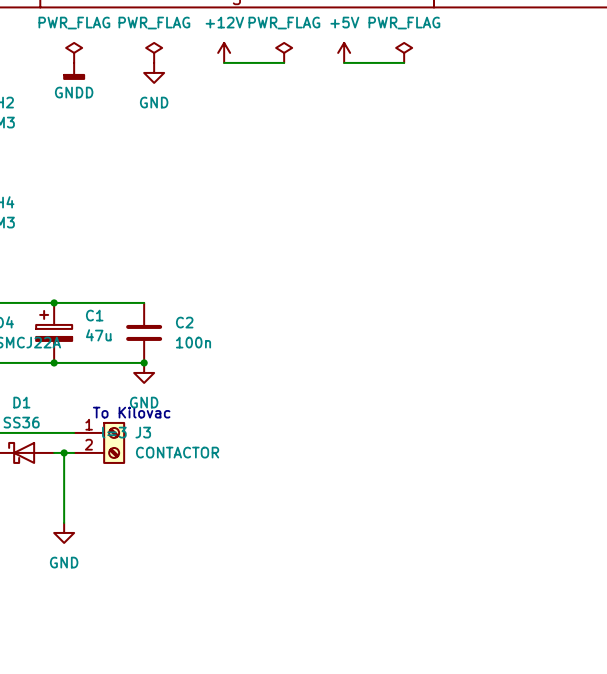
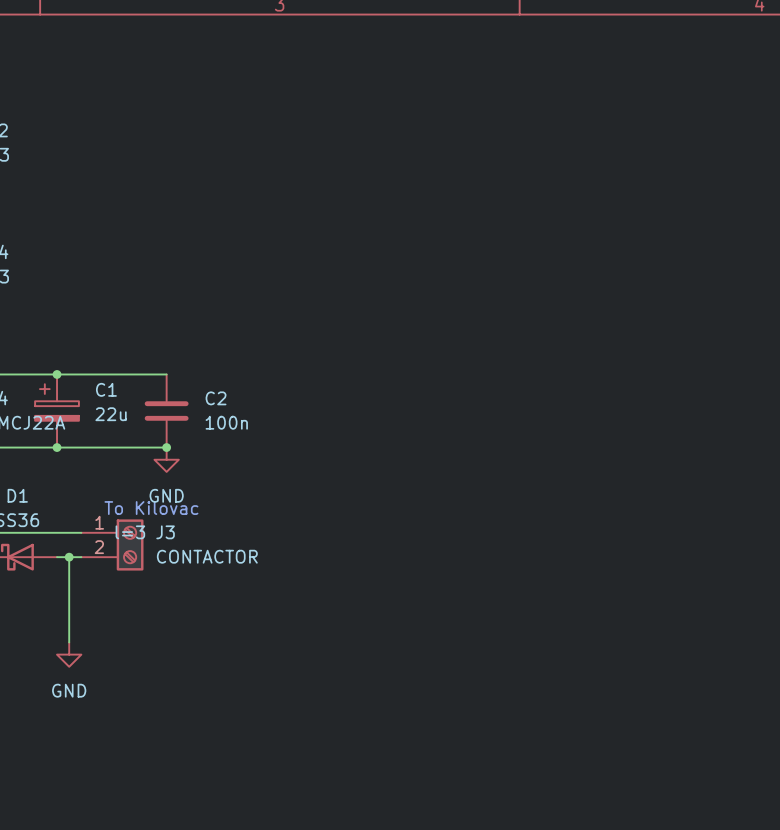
power symbol: PWR_FLAG (74, 52) -> none
power symbol: PWR_FLAG (154, 52) -> none
power symbol: +12V (224, 52) -> none
power symbol: PWR_FLAG (284, 52) -> none
power symbol: +5V (344, 52) -> none
power symbol: PWR_FLAG (404, 52) -> none
wire: (224, 62) (284, 62) -> none
wire: (344, 62) (404, 62) -> none
power symbol: GNDD (74, 71) -> none
power symbol: GND (154, 72) -> none
C1 value: 47u (98, 335) -> 22u (111, 414)

